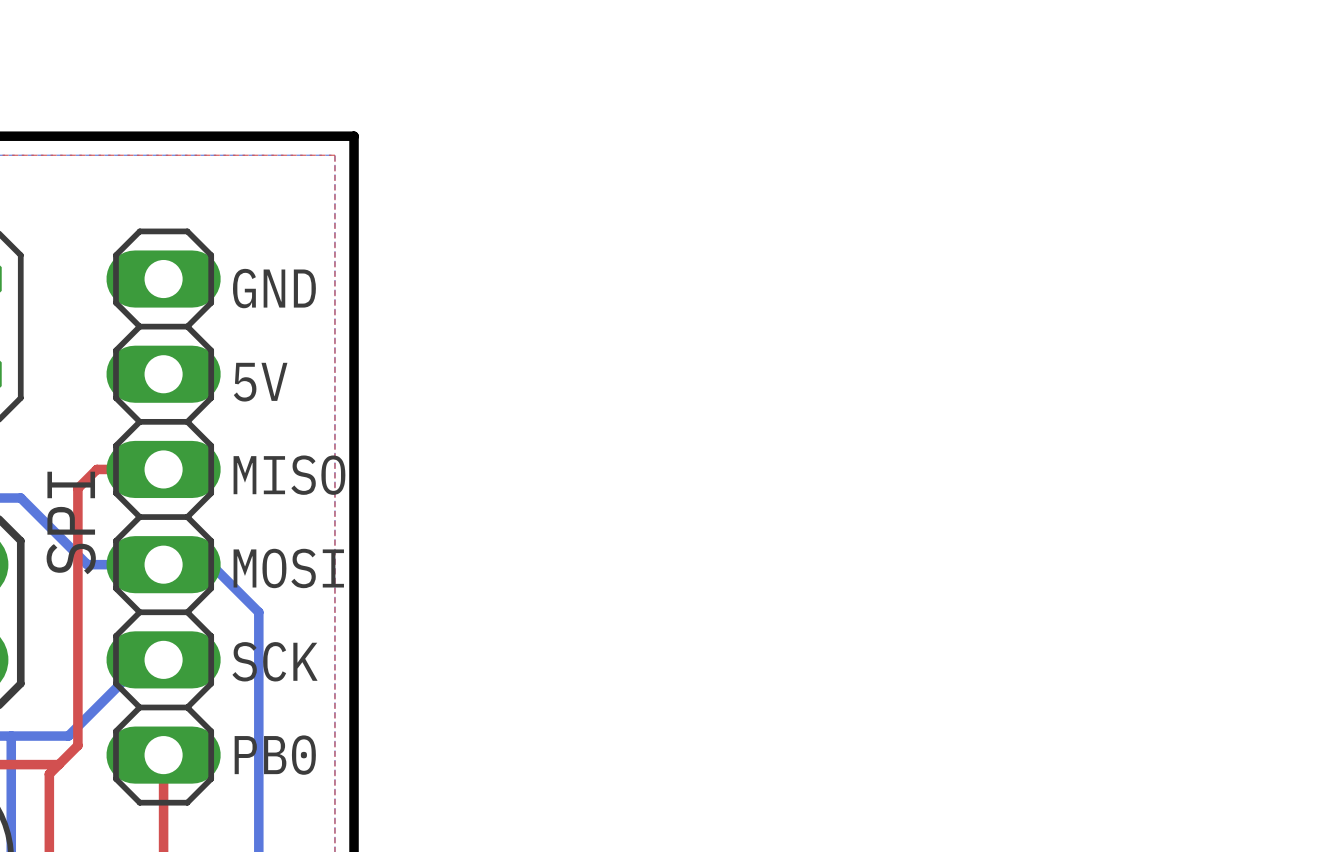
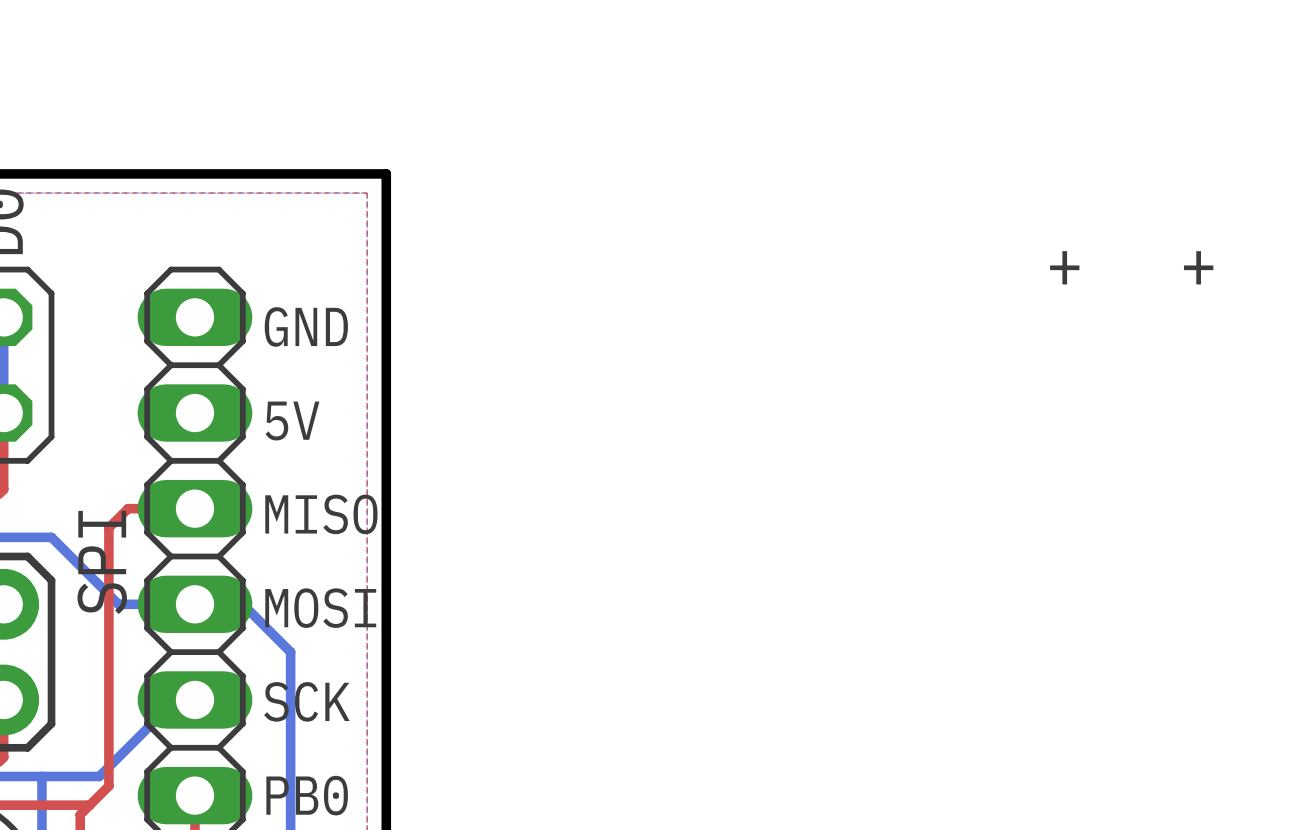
text: none -> + (1064, 267)
text: none -> + (1198, 267)

